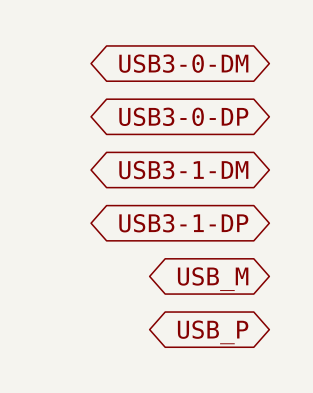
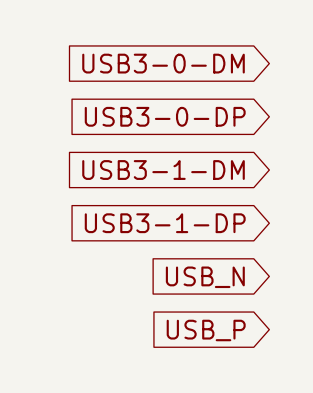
global label shape: bidirectional (183, 63) -> input (163, 63)
global label shape: bidirectional (183, 116) -> input (165, 116)
global label shape: bidirectional (183, 170) -> input (163, 170)
global label shape: bidirectional (183, 223) -> input (165, 223)
global label shape: bidirectional (213, 279) -> input (205, 277)
global label: USB_M (213, 279) -> USB_N (205, 277)
global label shape: bidirectional (213, 332) -> input (206, 330)

